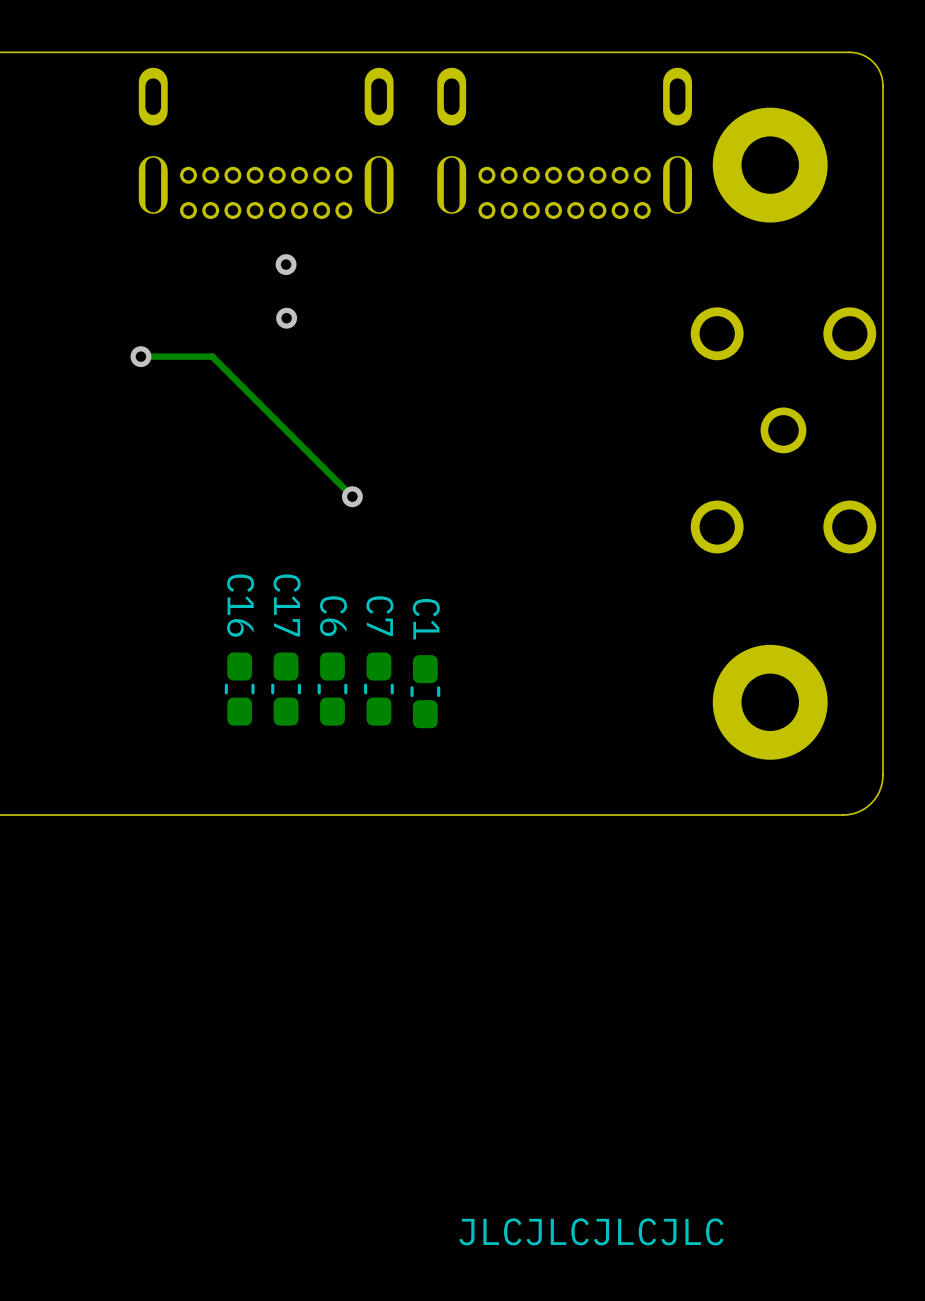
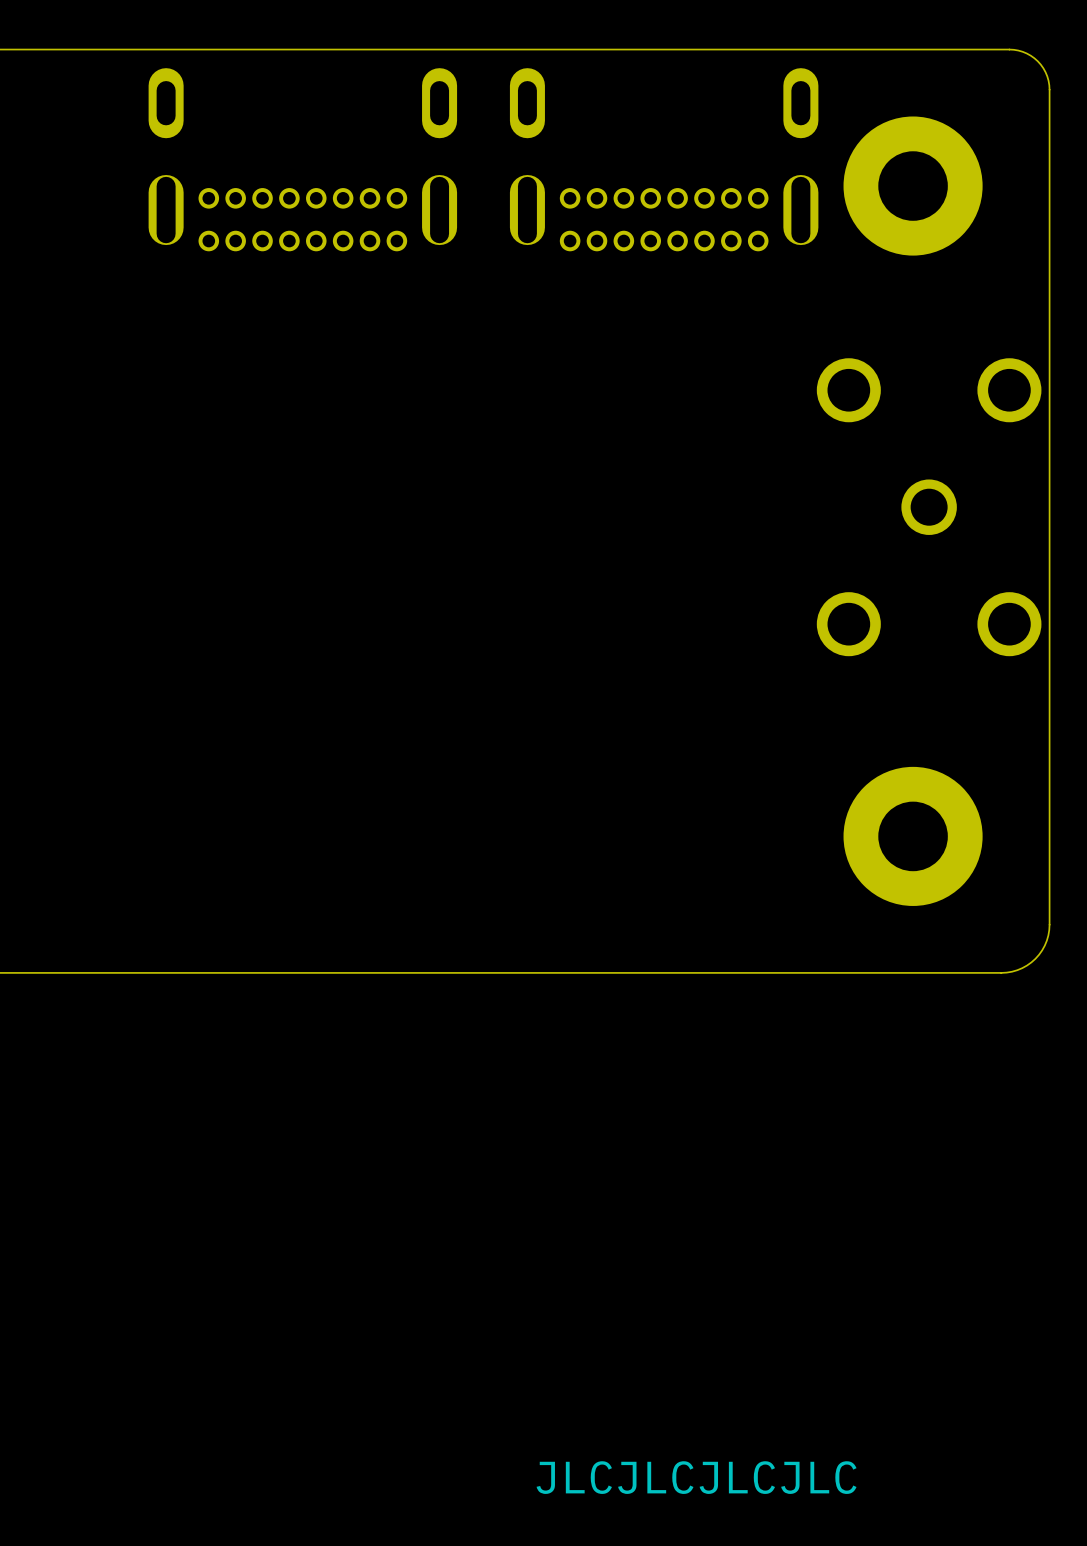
via: (286, 264) -> none
via: (286, 318) -> none
track: (140, 356) (212, 356) (352, 496) -> none
via: (140, 356) -> none
via: (352, 496) -> none
C16: (239, 689) -> none
C17: (286, 689) -> none
C6: (332, 689) -> none
C7: (378, 689) -> none
C1: (425, 691) -> none

